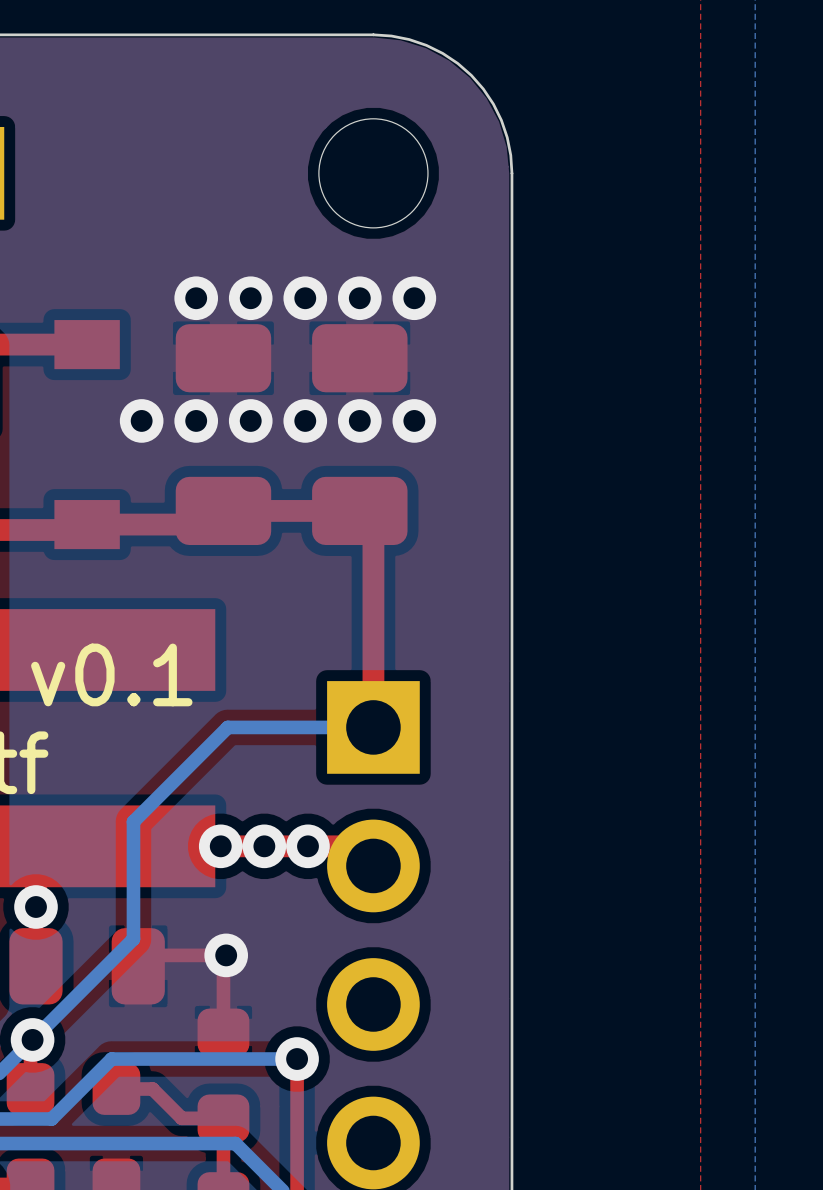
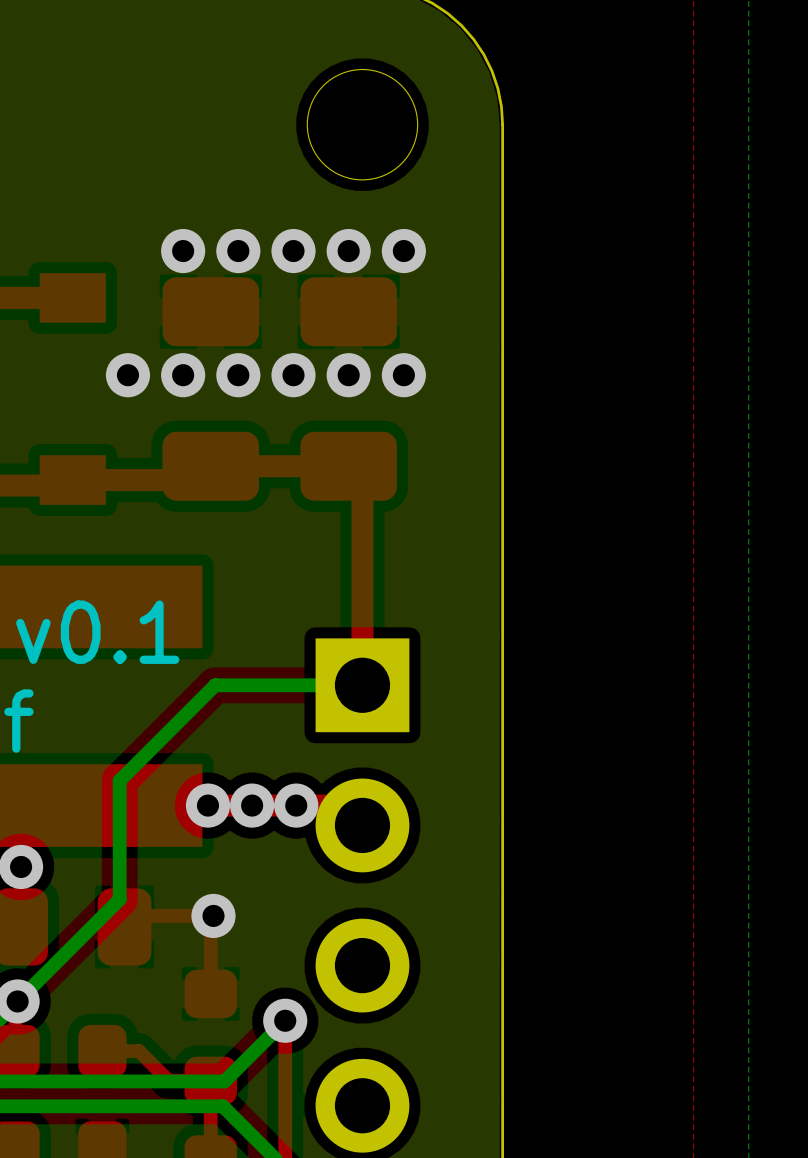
bottom track: (297, 1059) (111, 1059) (51, 1119) -> (285, 1020) (224, 1081) (36, 1081)

